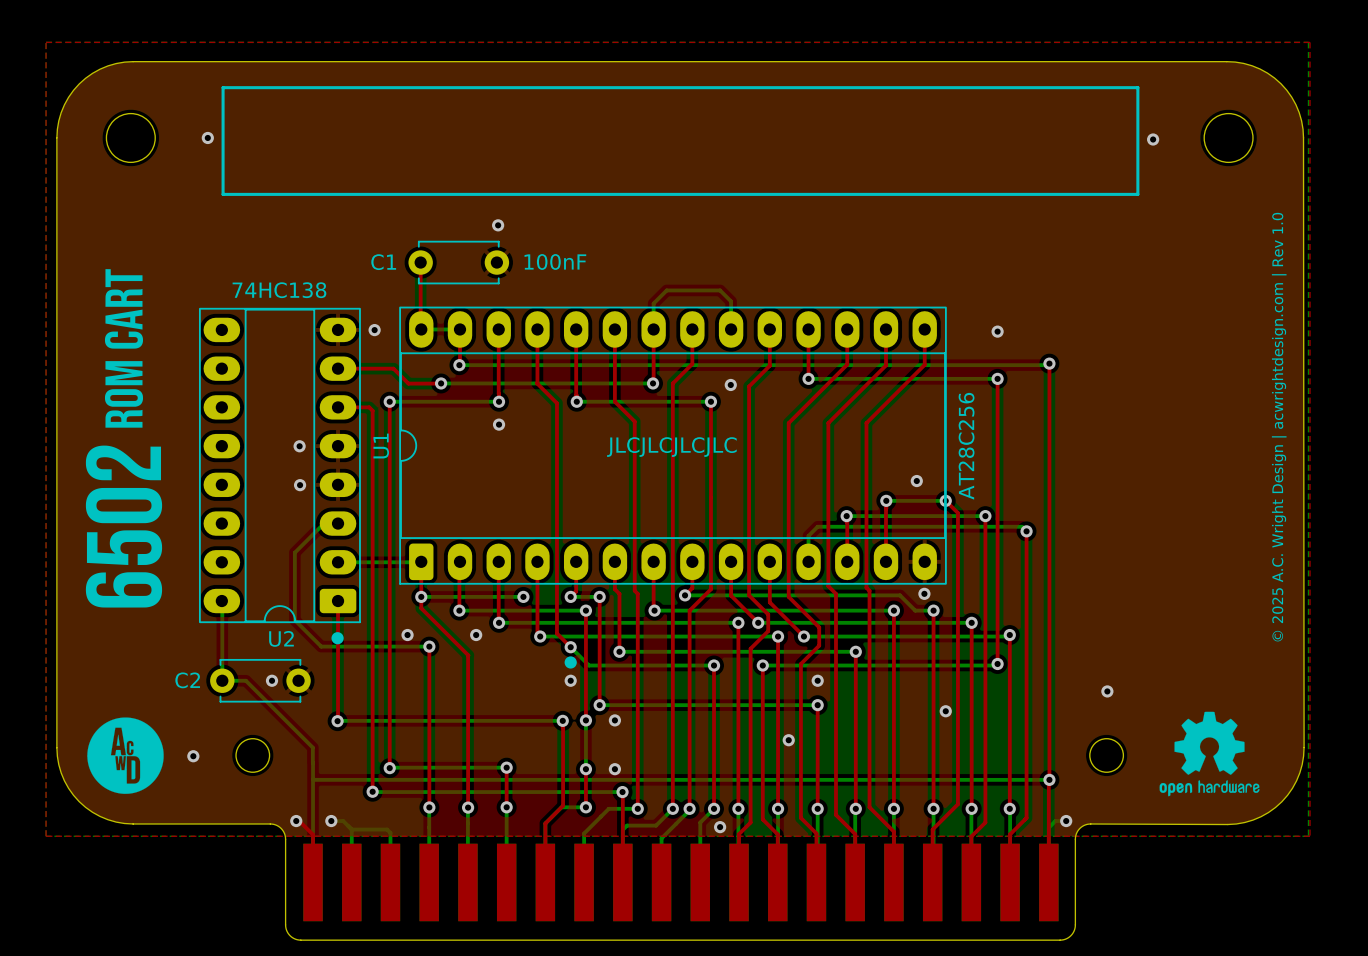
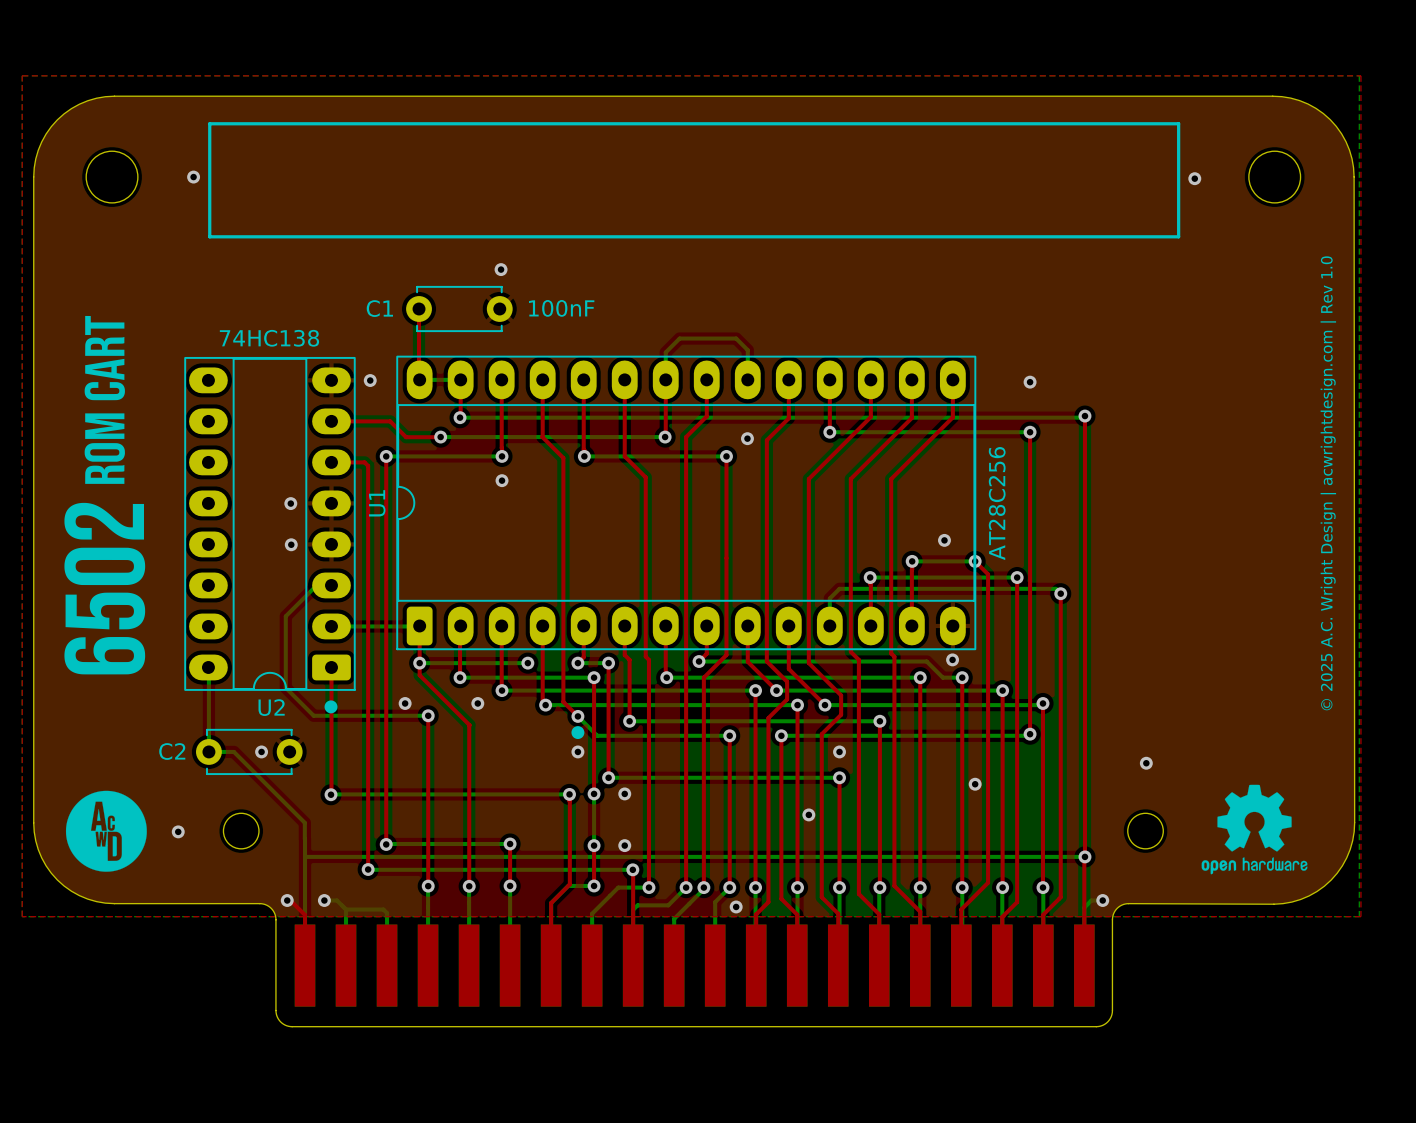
text: JLCJLCJLCJLC (671, 447) -> none

